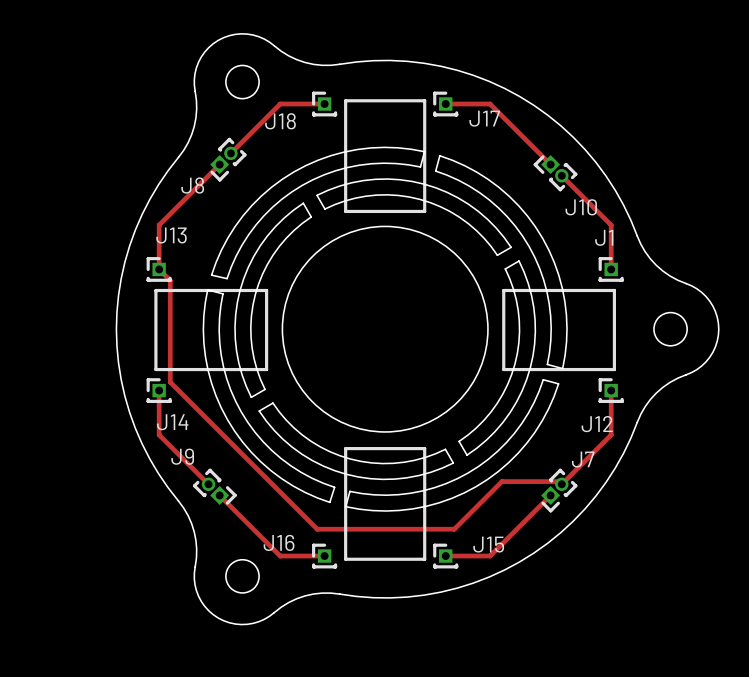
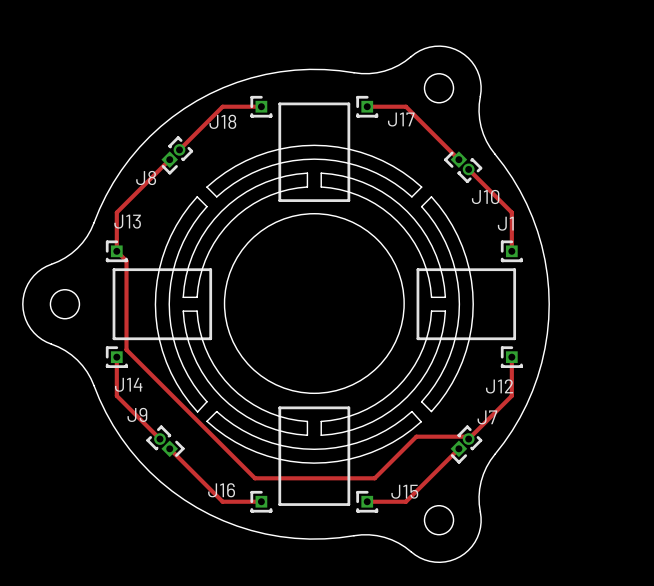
board edge: (274, 45) (253, 35) (235, 34) (218, 40) (201, 56) (195, 73) (196, 108) (191, 134) (183, 150) (149, 199) (135, 229) (124, 262) (116, 312) (116, 346) (124, 396) (135, 428) (149, 459) (183, 508) (191, 523) (195, 540) (194, 578) (198, 596) (208, 610) (218, 618) (241, 624) (264, 619) (288, 602) (304, 595) (322, 593) (373, 597) (424, 595) (473, 583) (519, 561) (560, 532) (585, 508) (615, 468) (640, 414) (650, 399) (670, 382) (696, 369) (705, 361) (715, 346) (718, 329) (715, 311) (705, 296) (696, 288) (670, 276) (650, 258) (640, 244) (615, 190) (596, 162) (573, 137) (533, 105) (489, 81) (440, 66) (390, 60) (331, 65) (313, 64) (296, 59) (274, 45) -> (411, 56) (398, 65) (376, 72) (361, 73) (309, 69) (265, 74) (223, 87) (184, 108) (149, 136) (130, 158) (113, 182) (90, 229) (82, 242) (65, 257) (42, 268) (34, 275) (25, 288) (22, 304) (25, 319) (34, 332) (42, 339) (65, 350) (82, 365) (90, 378) (113, 425) (139, 461) (172, 491) (196, 507) (237, 526) (280, 536) (324, 538) (369, 534) (384, 537) (398, 543) (419, 557) (440, 562) (460, 556) (471, 546) (477, 537) (481, 522) (479, 489) (483, 474) (490, 460) (519, 417) (532, 390) (541, 362) (548, 319) (548, 289) (545, 260) (532, 217) (519, 190) (490, 147) (483, 134) (479, 111) (480, 80) (474, 66) (460, 51) (445, 46) (424, 48) (411, 56)
round board edge: [225, 64, 260, 100] -> none
round board edge: none -> [423, 73, 455, 104]
board edge: (424, 151) (420, 166) (383, 163) (359, 165) (324, 174) (302, 185) (281, 199) (255, 225) (236, 255) (227, 278) (211, 275) (221, 250) (243, 215) (271, 187) (294, 171) (318, 160) (357, 149) (384, 147) (424, 151) -> none
board edge: (439, 155) (435, 171) (469, 186) (489, 199) (507, 216) (528, 246) (543, 279) (549, 303) (551, 328) (547, 364) (562, 368) (566, 341) (564, 301) (554, 262) (542, 238) (518, 205) (498, 187) (464, 165) (439, 155) -> none
board edge: none -> (307, 173) (307, 186) (288, 189) (270, 195) (253, 203) (231, 221) (219, 235) (205, 260) (199, 278) (197, 297) (183, 297) (186, 276) (196, 245) (207, 227) (221, 211) (246, 191) (265, 182) (286, 176) (307, 173)
board edge: none -> (321, 173) (321, 186) (339, 189) (358, 195) (375, 203) (397, 221) (409, 235) (423, 260) (428, 278) (431, 297) (445, 297) (439, 265) (431, 245) (420, 227) (407, 211) (390, 197) (372, 186) (352, 178) (321, 173)
board edge: none -> (206, 187) (216, 196) (242, 178) (262, 168) (292, 160) (314, 159) (335, 160) (366, 168) (395, 183) (411, 196) (421, 187) (393, 166) (371, 156) (349, 149) (314, 145) (290, 147) (256, 156) (225, 172) (206, 187)
board edge: (317, 195) (324, 209) (345, 200) (366, 196) (387, 194) (419, 199) (440, 206) (459, 217) (476, 230) (497, 255) (511, 247) (496, 228) (468, 204) (447, 192) (424, 184) (400, 179) (375, 179) (351, 182) (317, 195) -> none
board edge: (303, 203) (311, 216) (286, 237) (273, 255) (262, 274) (255, 294) (251, 315) (251, 337) (256, 369) (265, 389) (251, 397) (242, 374) (236, 350) (235, 314) (240, 290) (248, 267) (260, 245) (275, 226) (303, 203) -> none
board edge: none -> (197, 196) (206, 206) (188, 232) (179, 251) (170, 282) (169, 304) (170, 325) (179, 356) (188, 375) (206, 401) (197, 411) (182, 393) (166, 362) (157, 328) (155, 304) (157, 280) (166, 246) (182, 215) (197, 196)
board edge: none -> (431, 196) (421, 206) (440, 232) (449, 251) (455, 272) (459, 304) (457, 325) (449, 356) (434, 384) (421, 401) (431, 411) (452, 383) (462, 361) (469, 339) (473, 304) (471, 280) (462, 246) (446, 215) (431, 196)
board edge: (519, 261) (505, 268) (516, 299) (519, 320) (518, 342) (514, 363) (502, 394) (490, 412) (476, 428) (459, 441) (467, 455) (486, 440) (503, 422) (516, 402) (530, 368) (535, 331) (533, 307) (528, 283) (519, 261) -> none
board edge: (207, 289) (222, 293) (219, 318) (221, 354) (226, 378) (241, 412) (263, 441) (281, 458) (301, 472) (334, 487) (329, 502) (293, 485) (270, 470) (242, 442) (227, 419) (215, 395) (205, 356) (203, 316) (207, 289) -> none
round board edge: [653, 311, 688, 347] -> none
round board edge: none -> [49, 289, 81, 320]
board edge: none -> (183, 311) (197, 311) (202, 339) (209, 356) (219, 372) (231, 387) (245, 399) (261, 409) (288, 418) (307, 421) (307, 435) (286, 432) (265, 426) (237, 410) (221, 397) (207, 380) (192, 352) (186, 332) (183, 311)
board edge: none -> (431, 311) (445, 311) (442, 332) (431, 362) (414, 389) (399, 404) (372, 421) (352, 429) (321, 435) (321, 421) (339, 418) (366, 409) (382, 399) (403, 380) (414, 364) (423, 347) (428, 329) (431, 311)
board edge: (543, 379) (558, 383) (542, 420) (518, 453) (487, 479) (451, 498) (412, 508) (372, 510) (345, 506) (349, 491) (374, 494) (410, 493) (446, 483) (478, 466) (497, 451) (514, 433) (534, 402) (543, 379) -> none
board edge: (272, 403) (259, 411) (274, 430) (301, 454) (334, 470) (370, 478) (394, 479) (418, 475) (453, 463) (445, 449) (414, 460) (393, 463) (360, 461) (340, 455) (320, 446) (302, 434) (286, 420) (272, 403) -> none
board edge: none -> (216, 411) (206, 421) (235, 442) (267, 456) (302, 462) (337, 461) (360, 456) (392, 442) (421, 421) (411, 411) (395, 424) (366, 439) (335, 447) (303, 448) (282, 445) (262, 439) (242, 430) (216, 411)
round board edge: [225, 558, 260, 594] -> none
round board edge: none -> [423, 505, 455, 536]

